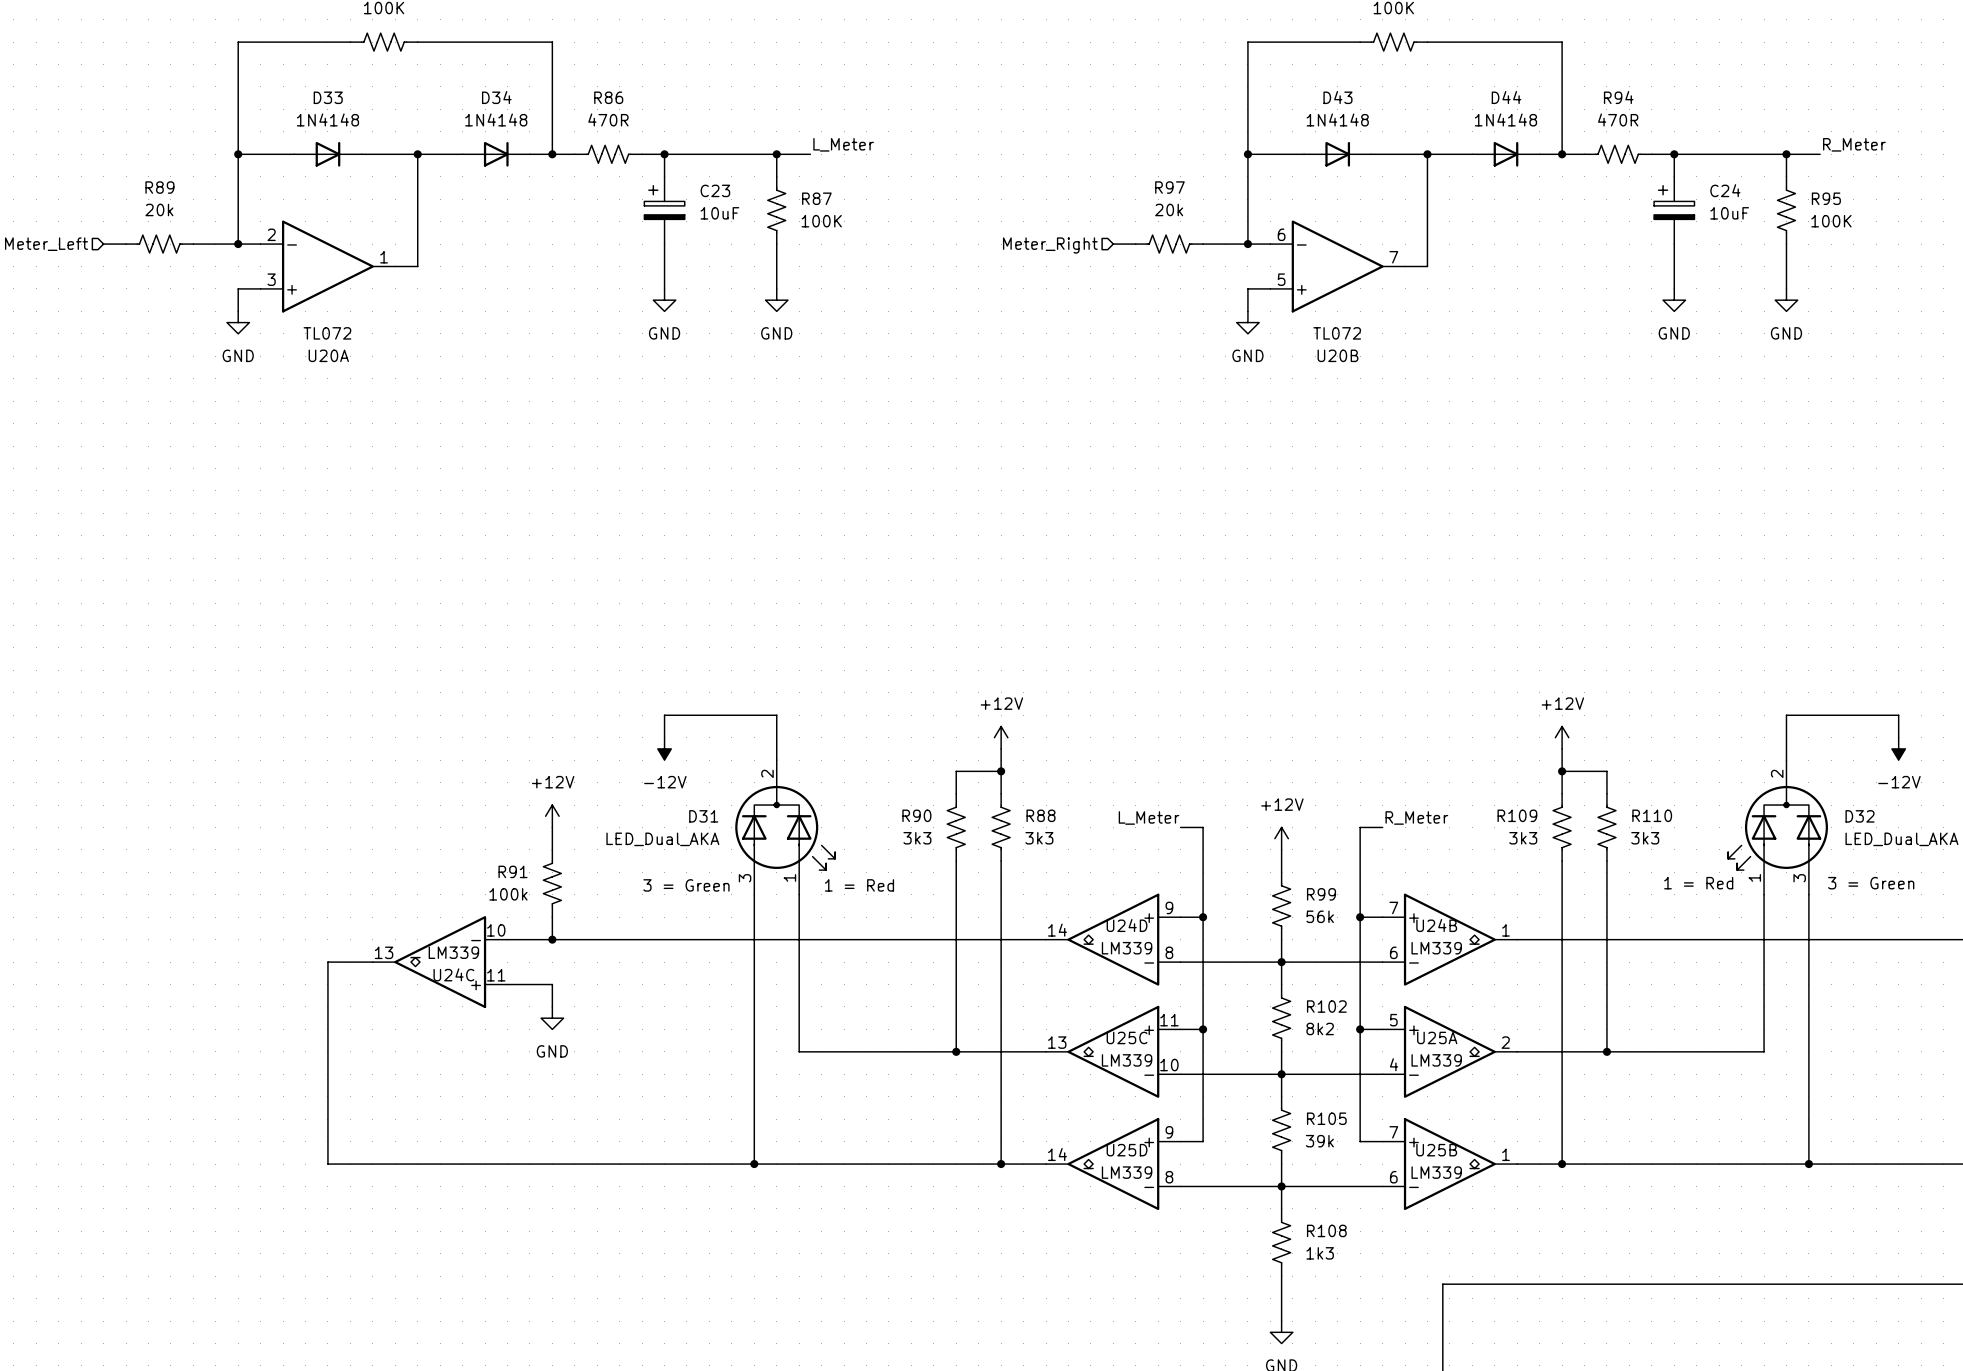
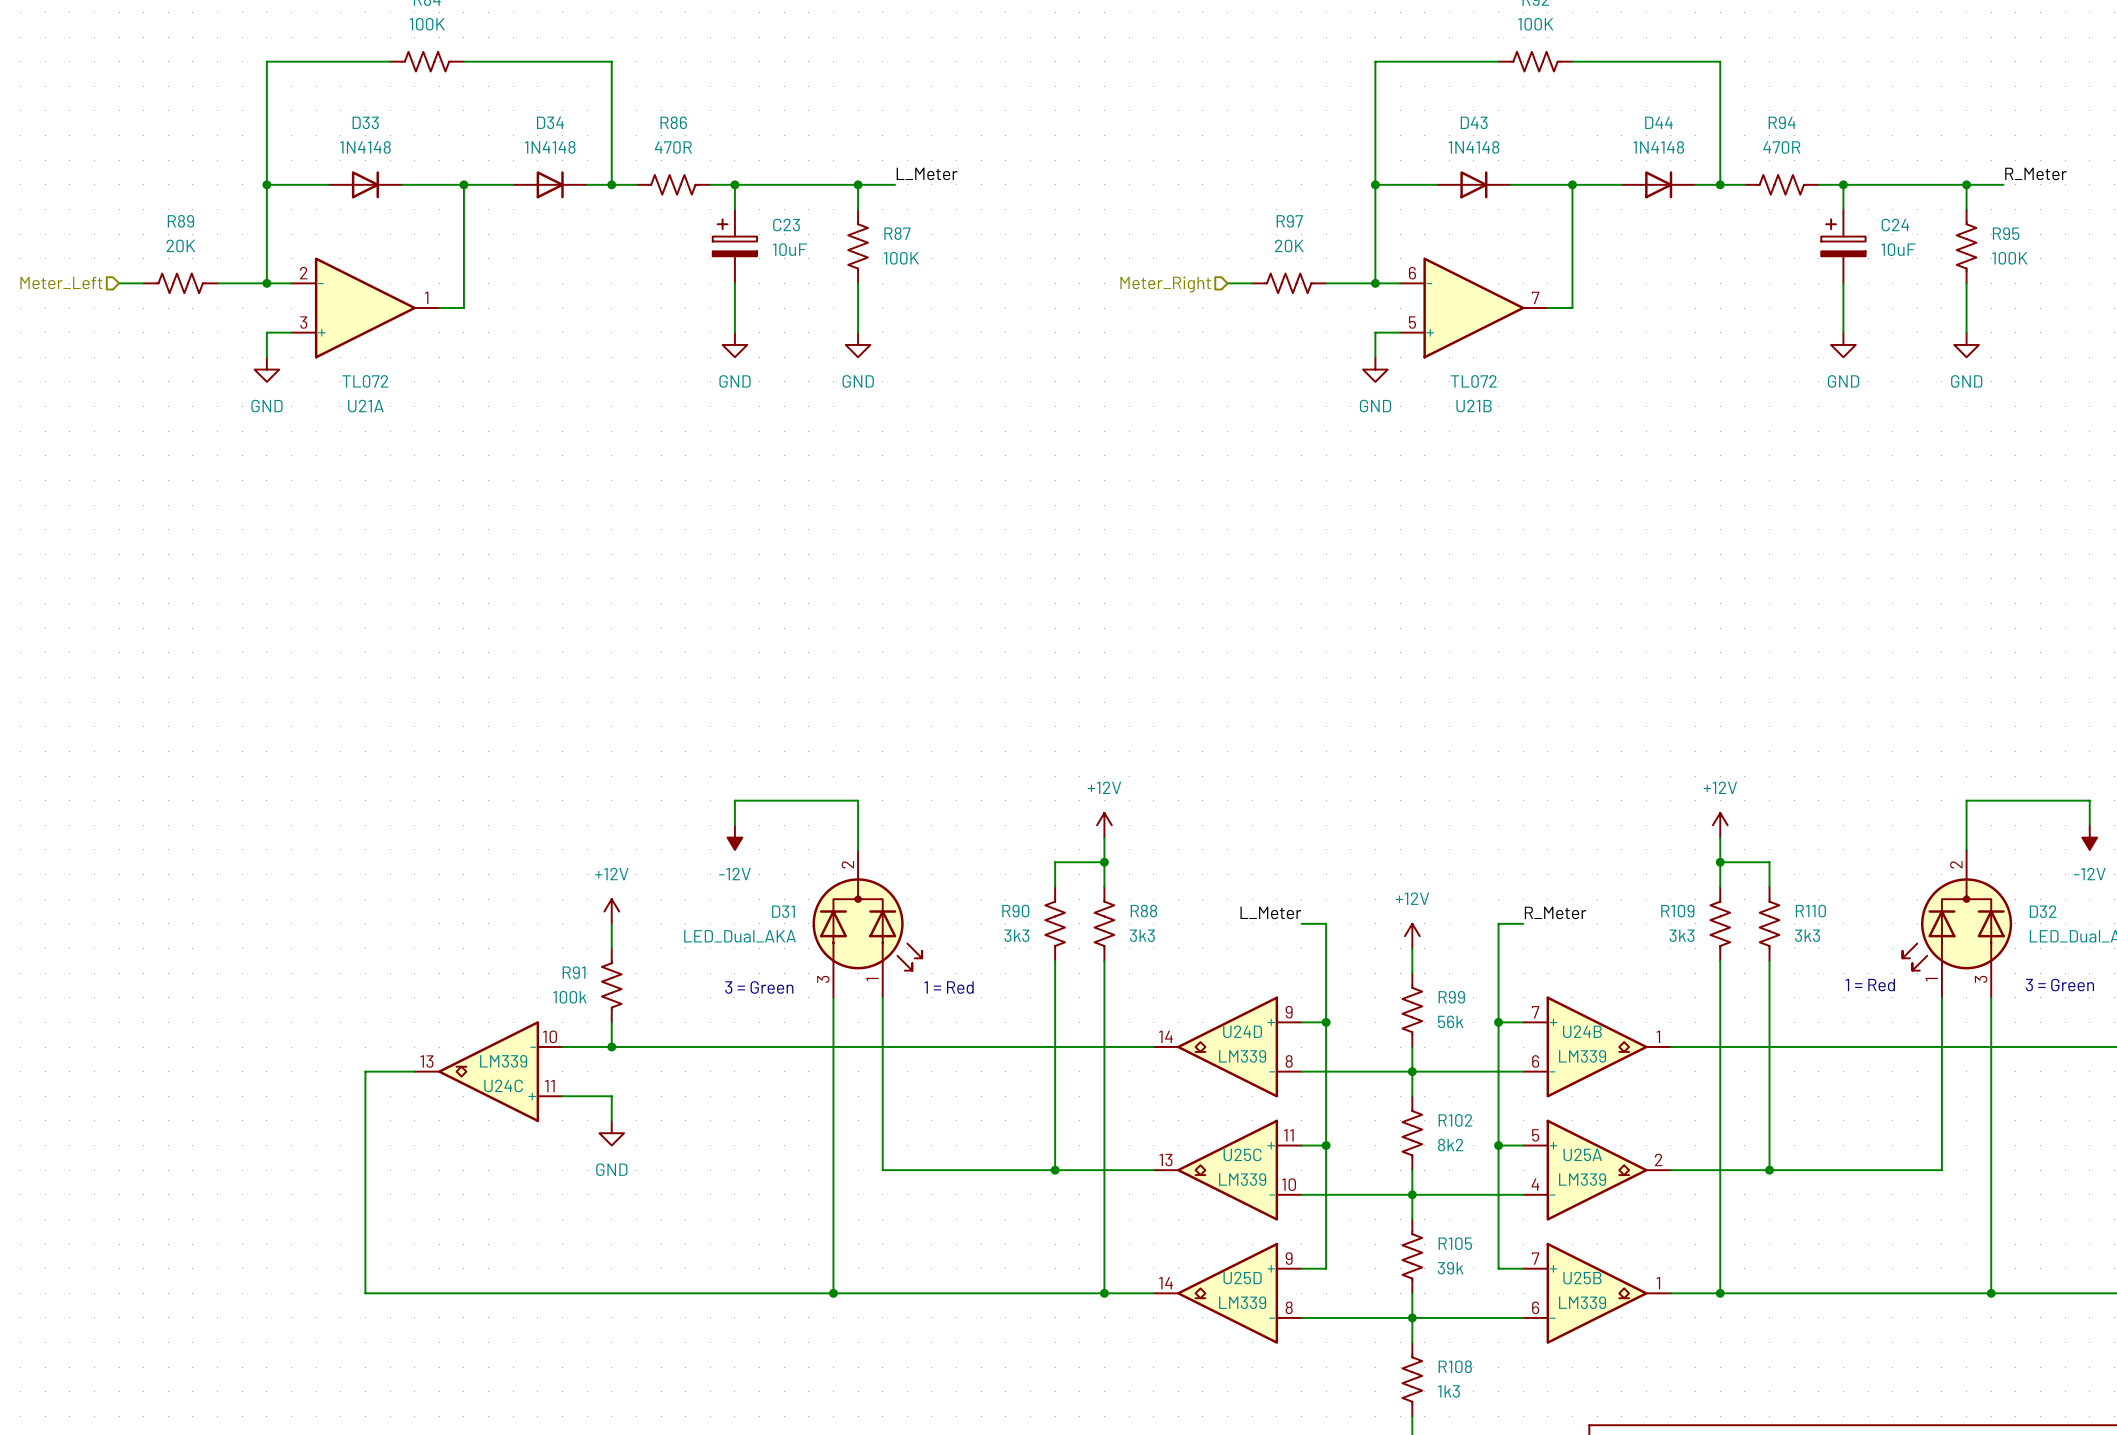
R89 value: 20k (159, 209) -> 20K (180, 245)
R97 value: 20k (1169, 209) -> 20K (1289, 245)
U20A name: U20A (328, 355) -> U21A (365, 406)
U20B name: U20B (1337, 355) -> U21B (1474, 406)

